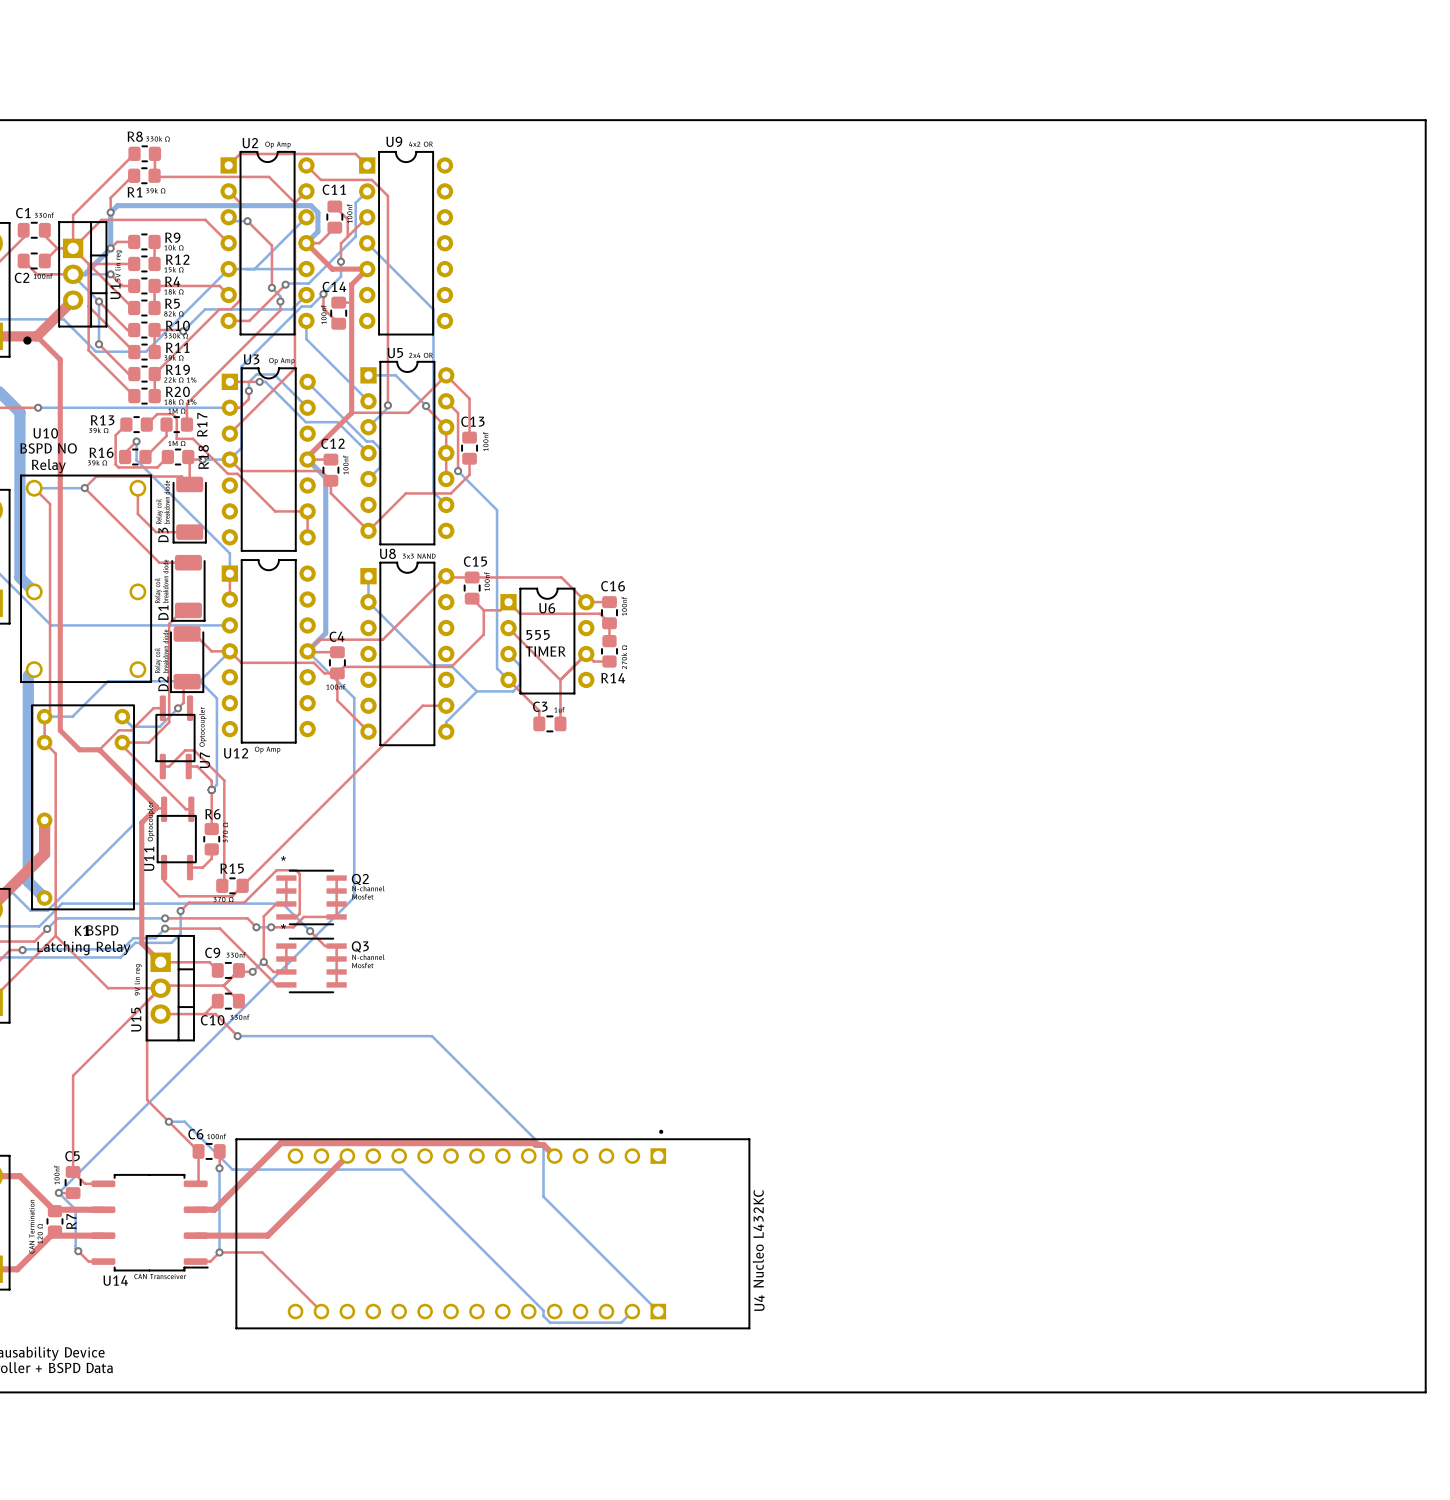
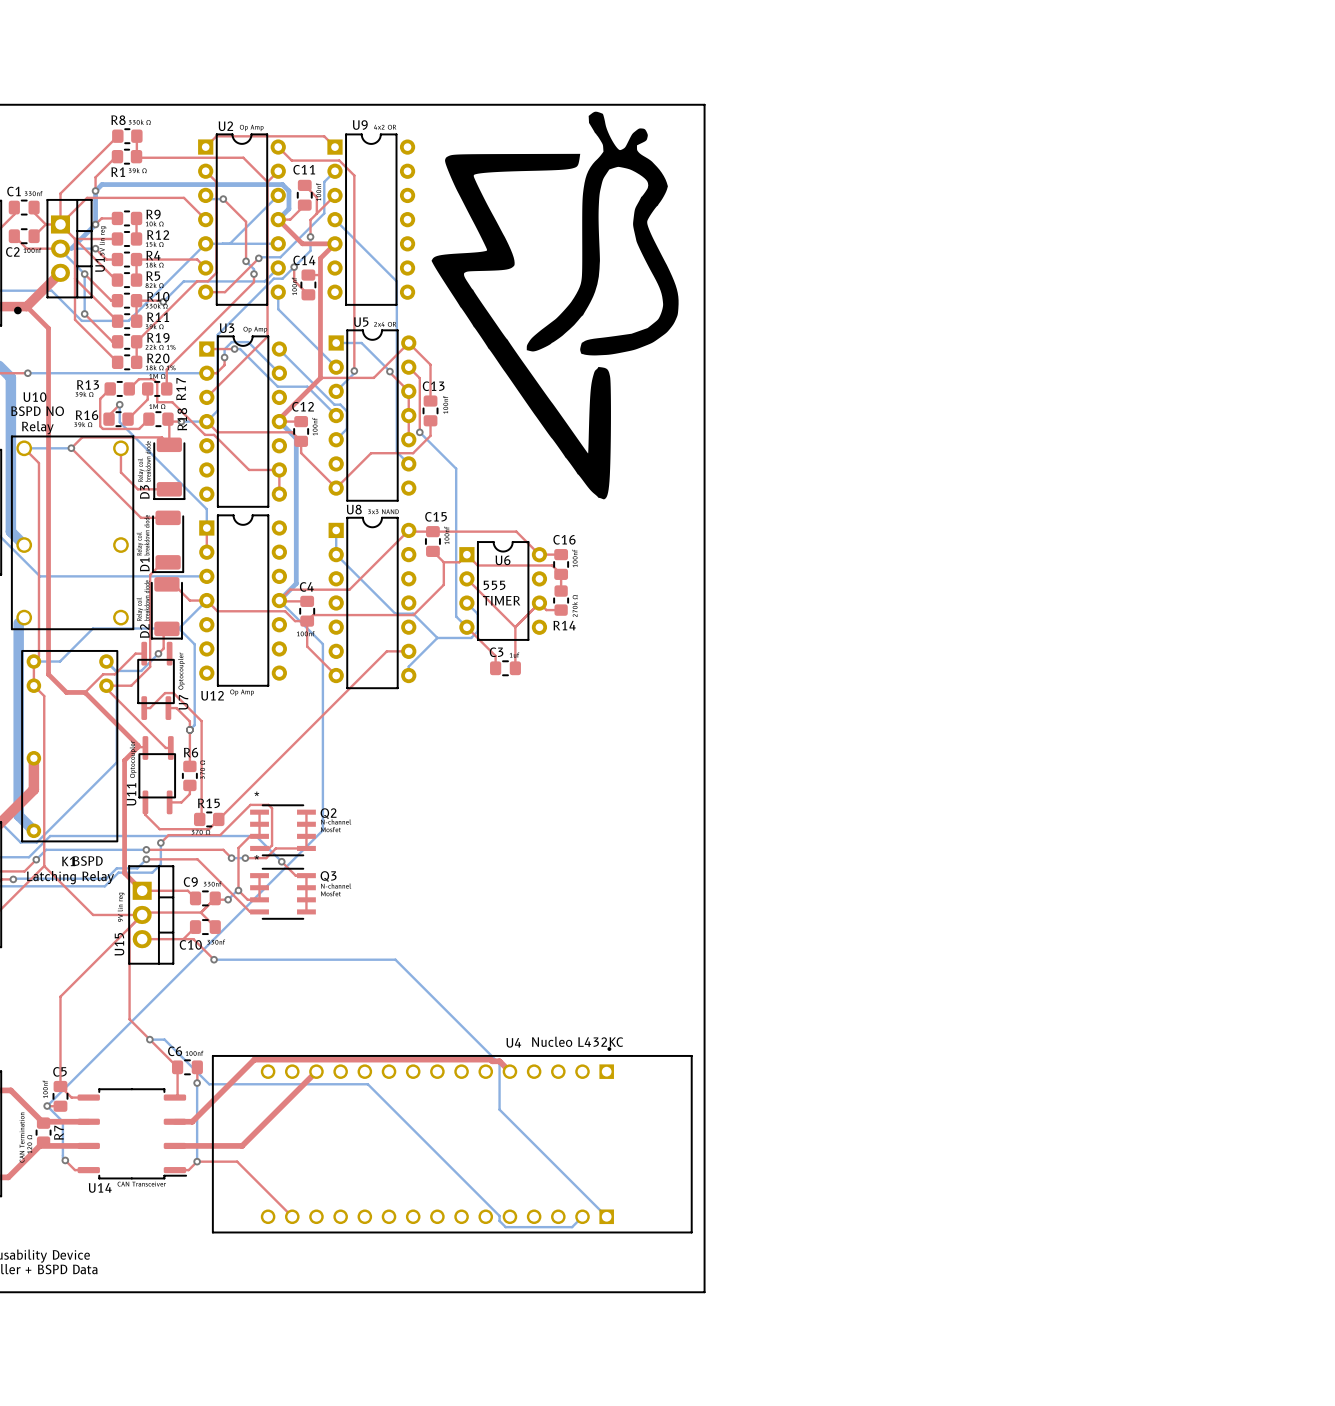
board edge: (763, 120) (1425, 120) (1425, 1392) (763, 1392) -> (704, 104) (704, 1292)
drawing: none -> [431, 111, 679, 500]
text rotation: 0° (758, 1238) -> 90° clockwise (577, 1041)
text position: Nucleo L432KC (758, 1238) -> Nucleo L432KC (577, 1041)
U4 name rotation: 0° (759, 1303) -> 90° clockwise (513, 1042)
U4 name position: U4 (759, 1303) -> U4 (513, 1042)

